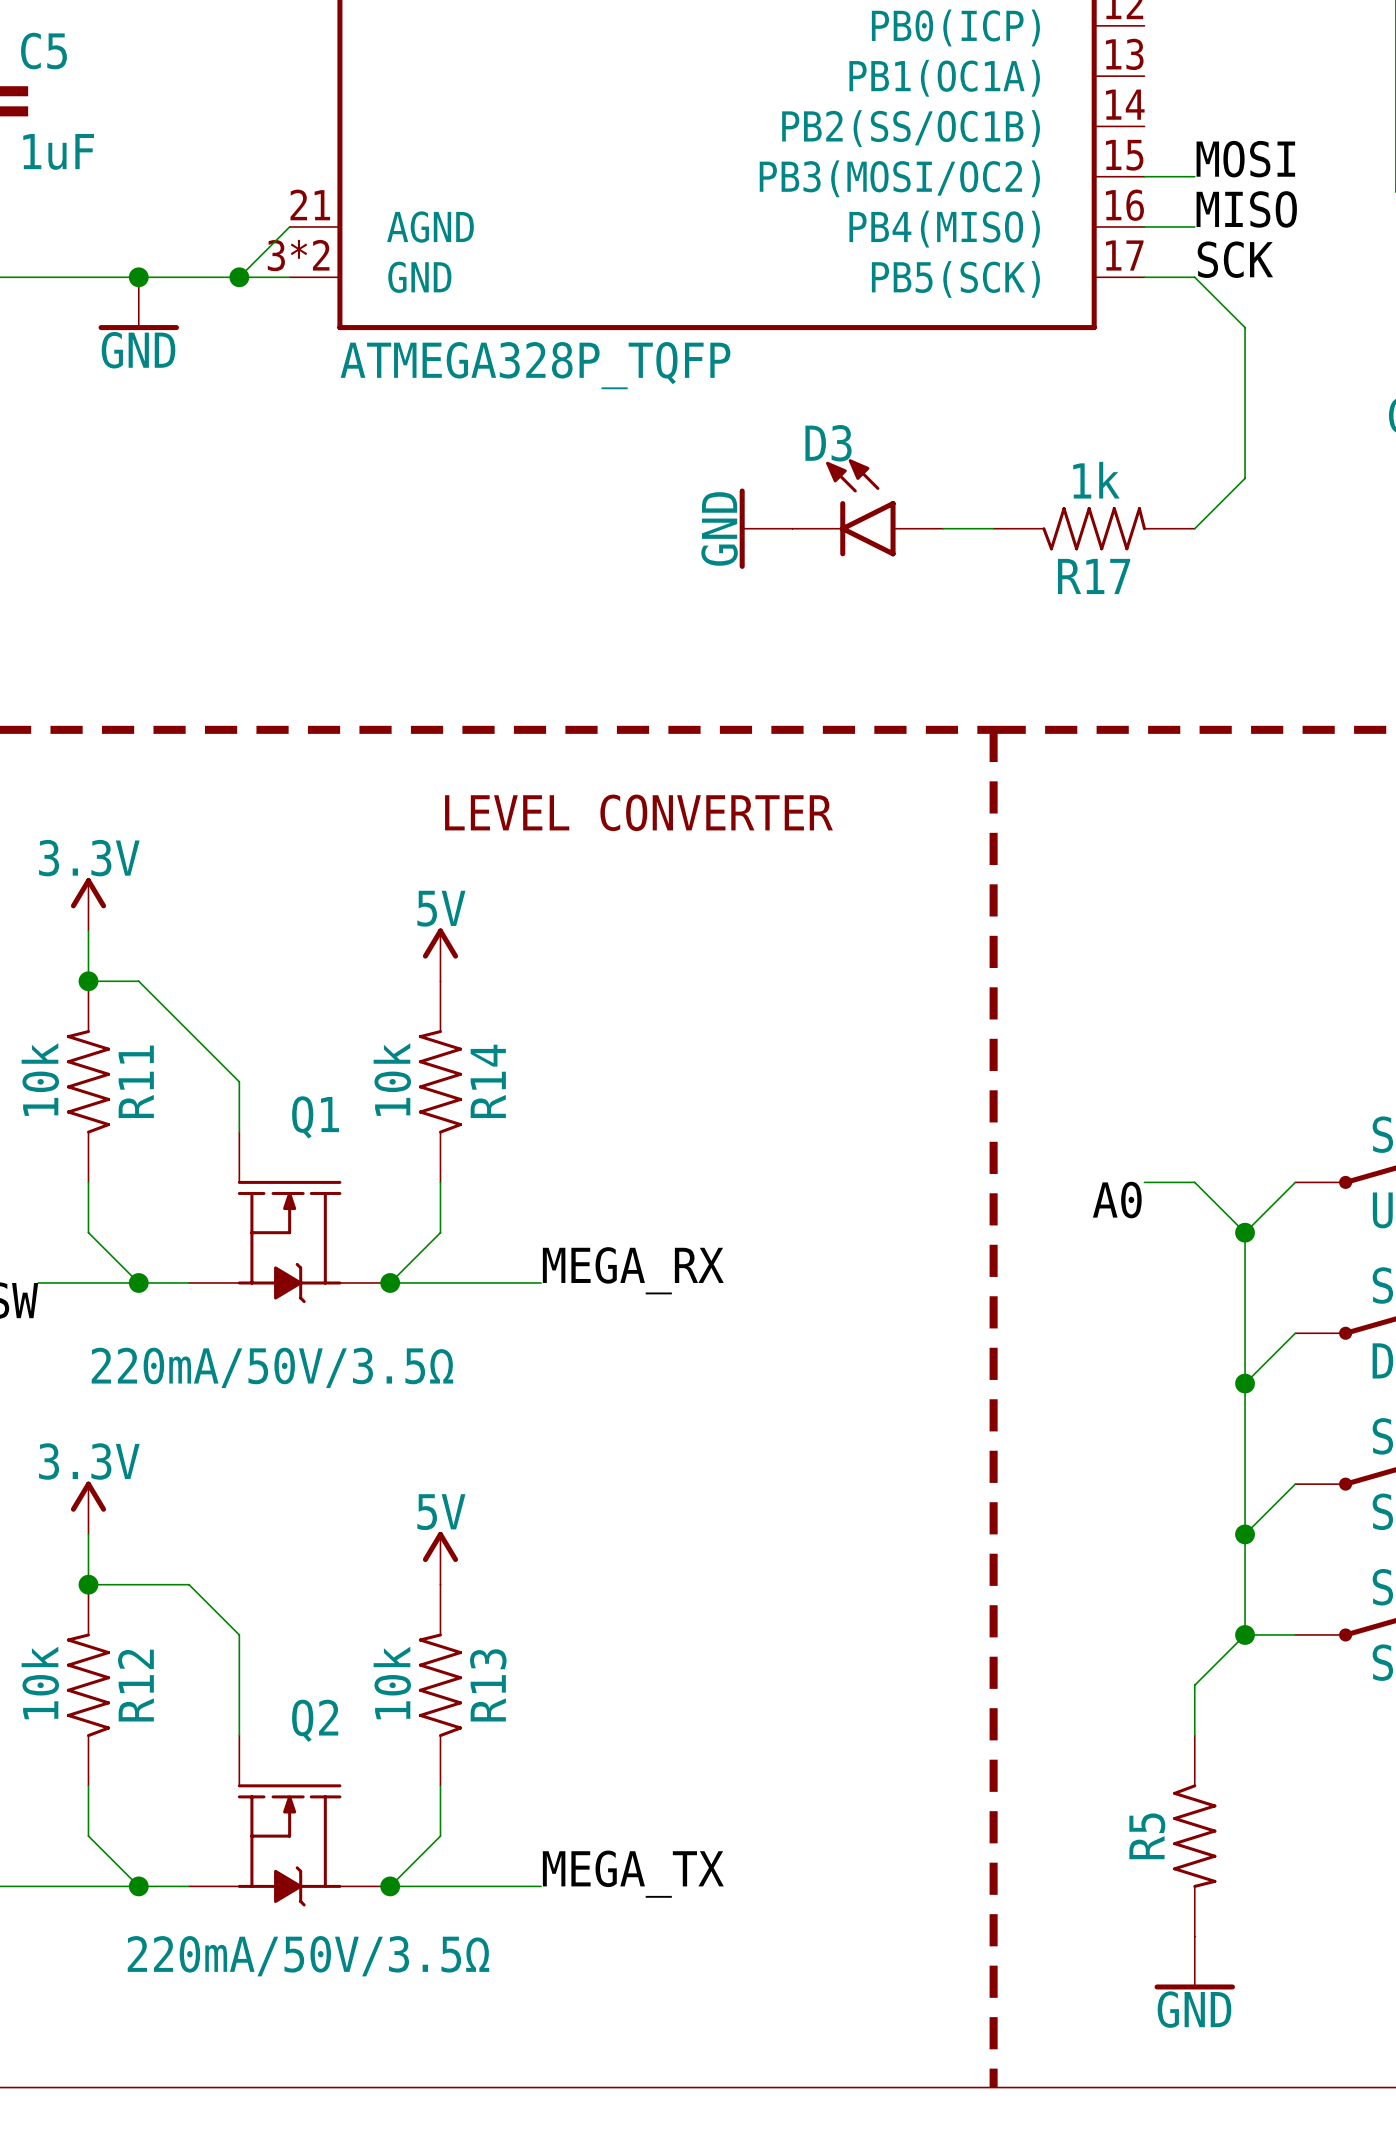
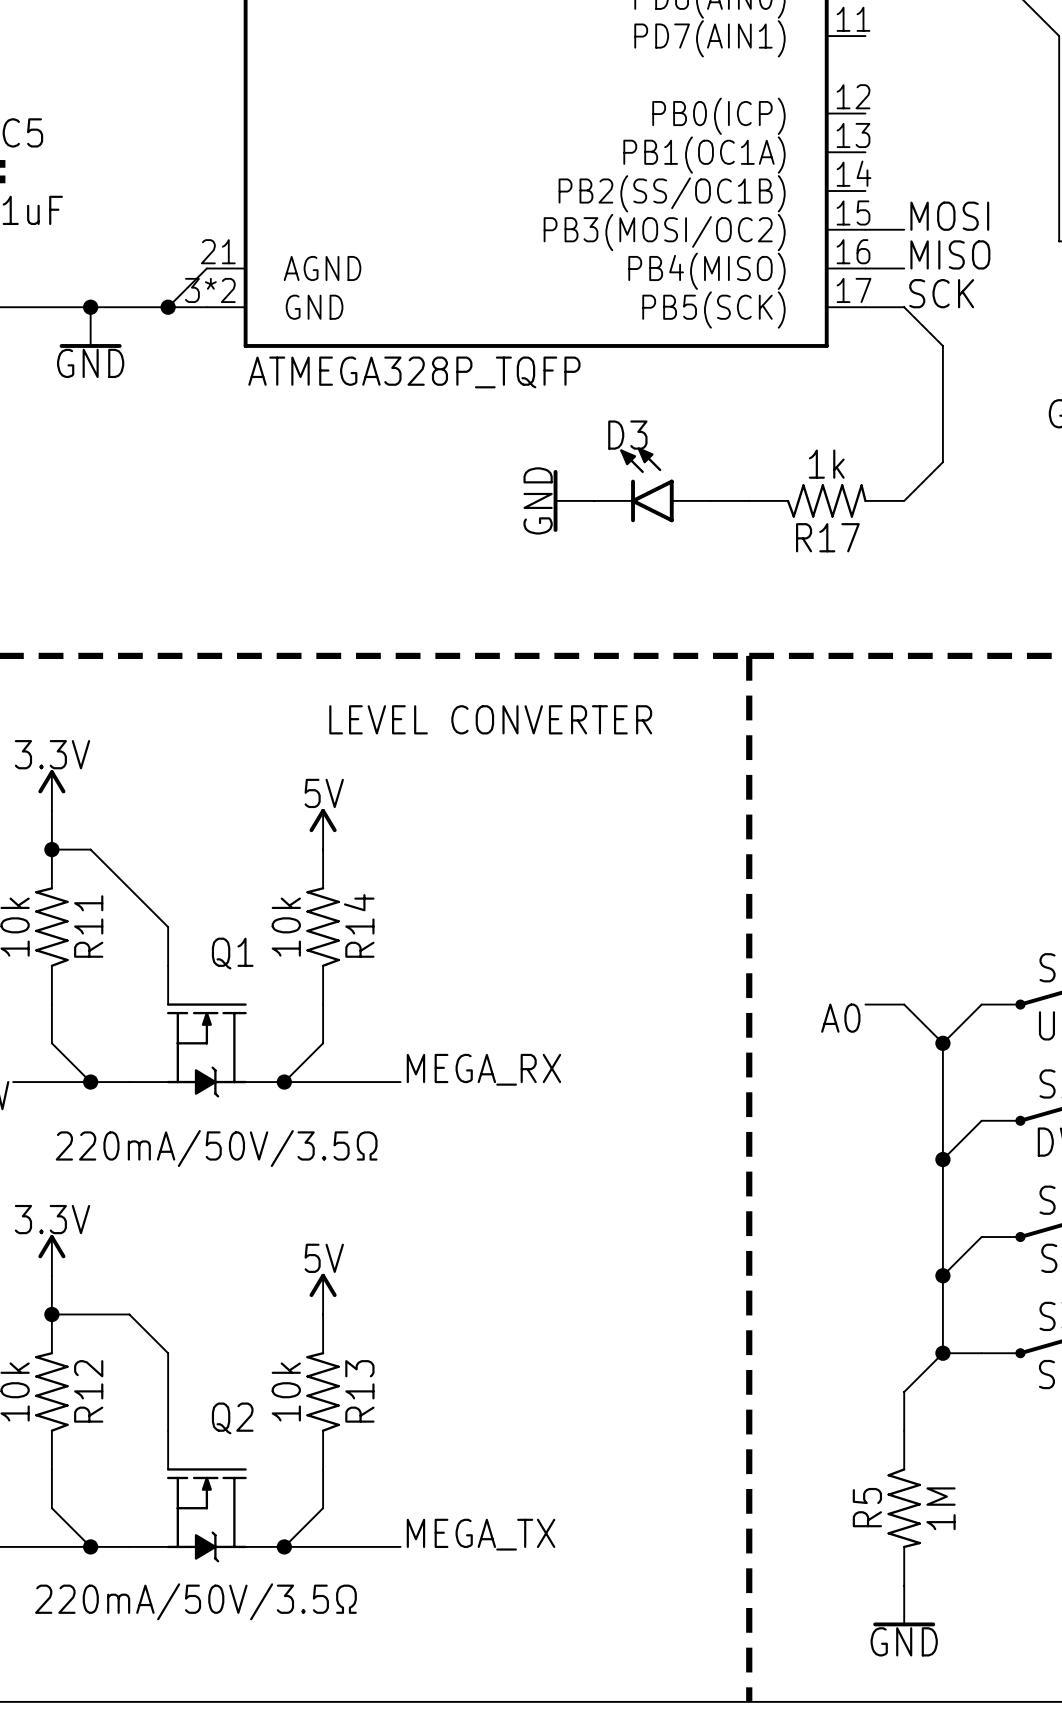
R5 value: none -> 1M (941, 1508)

